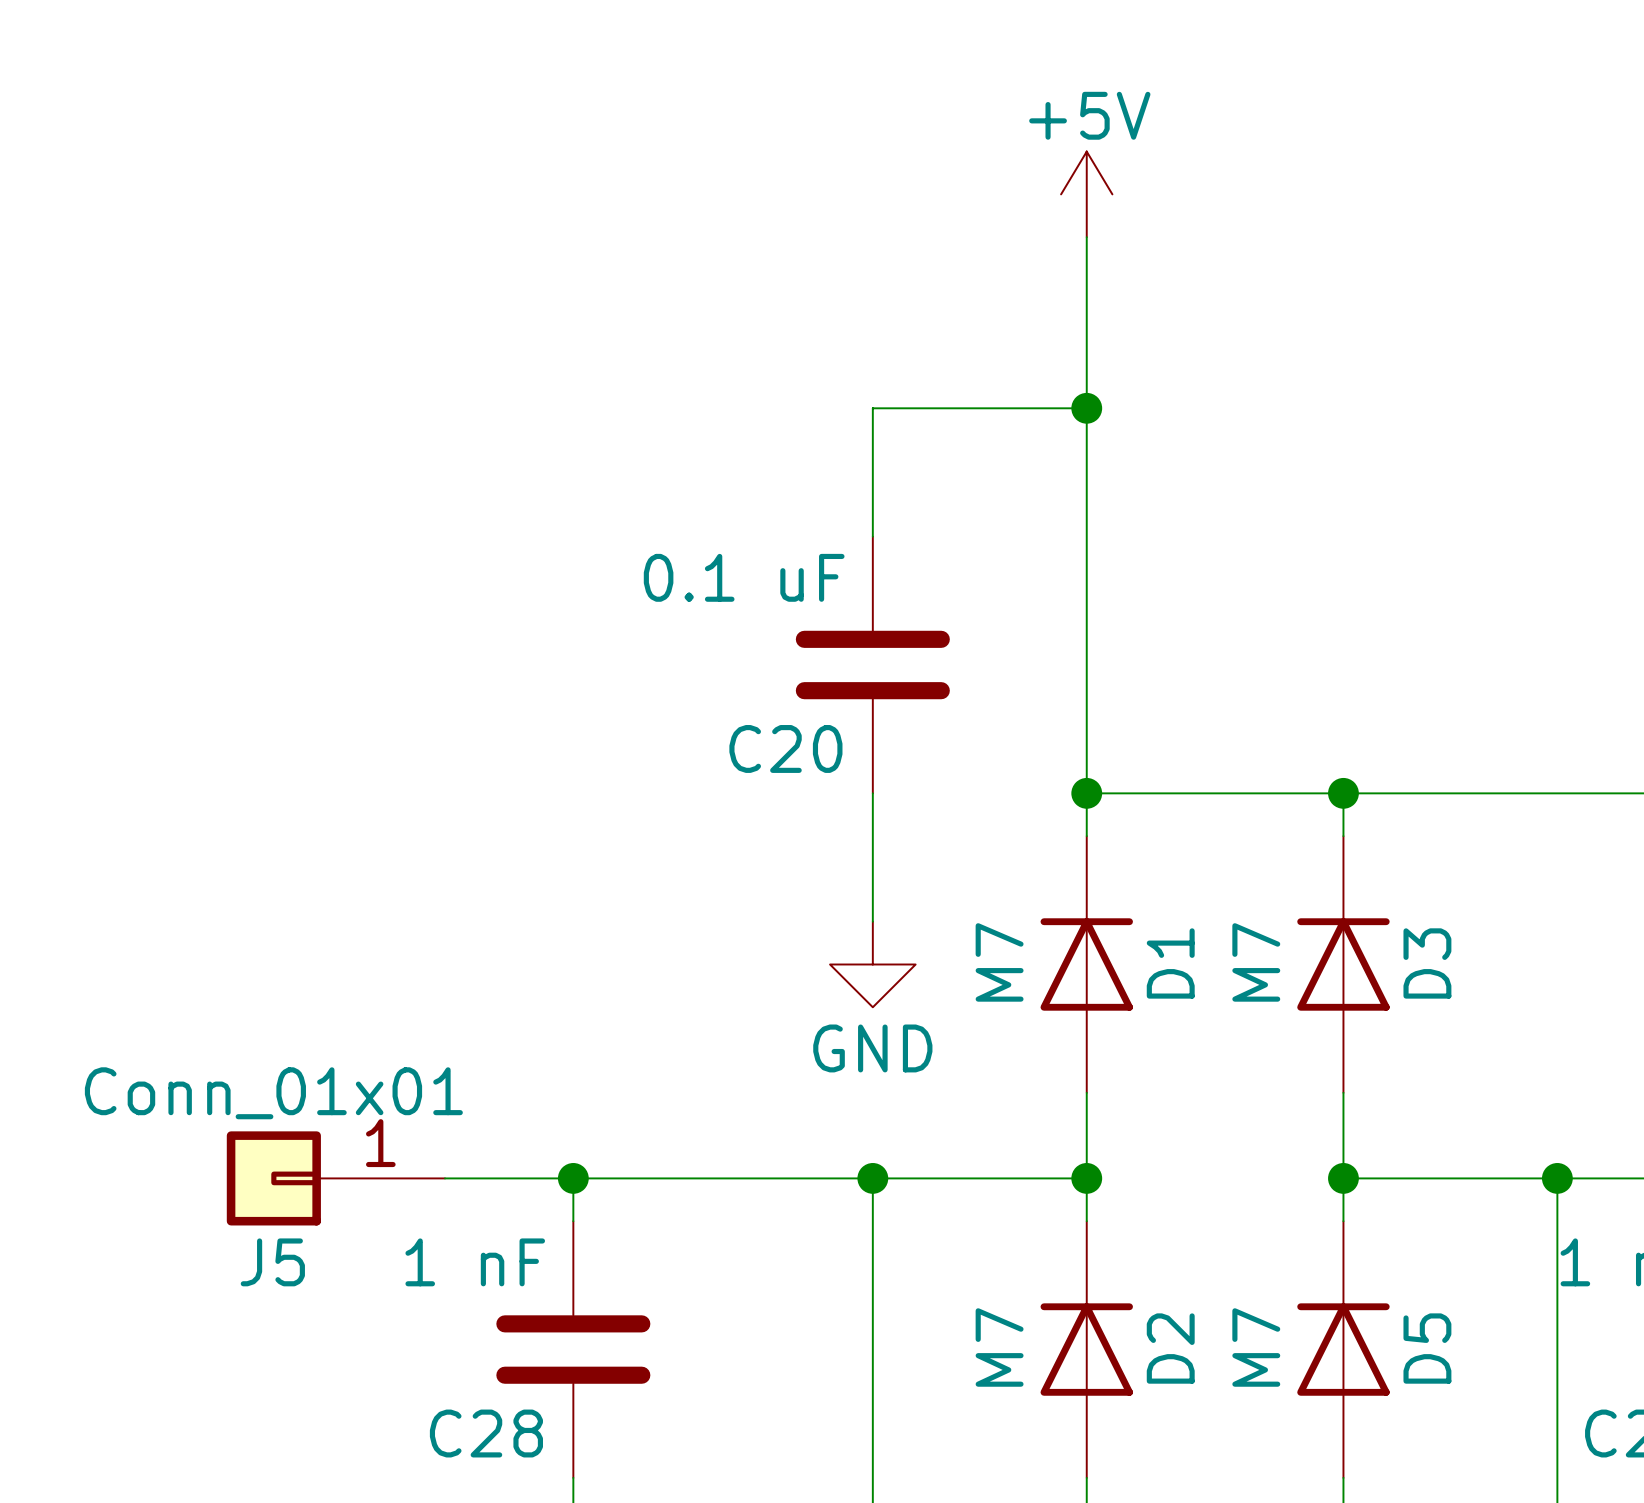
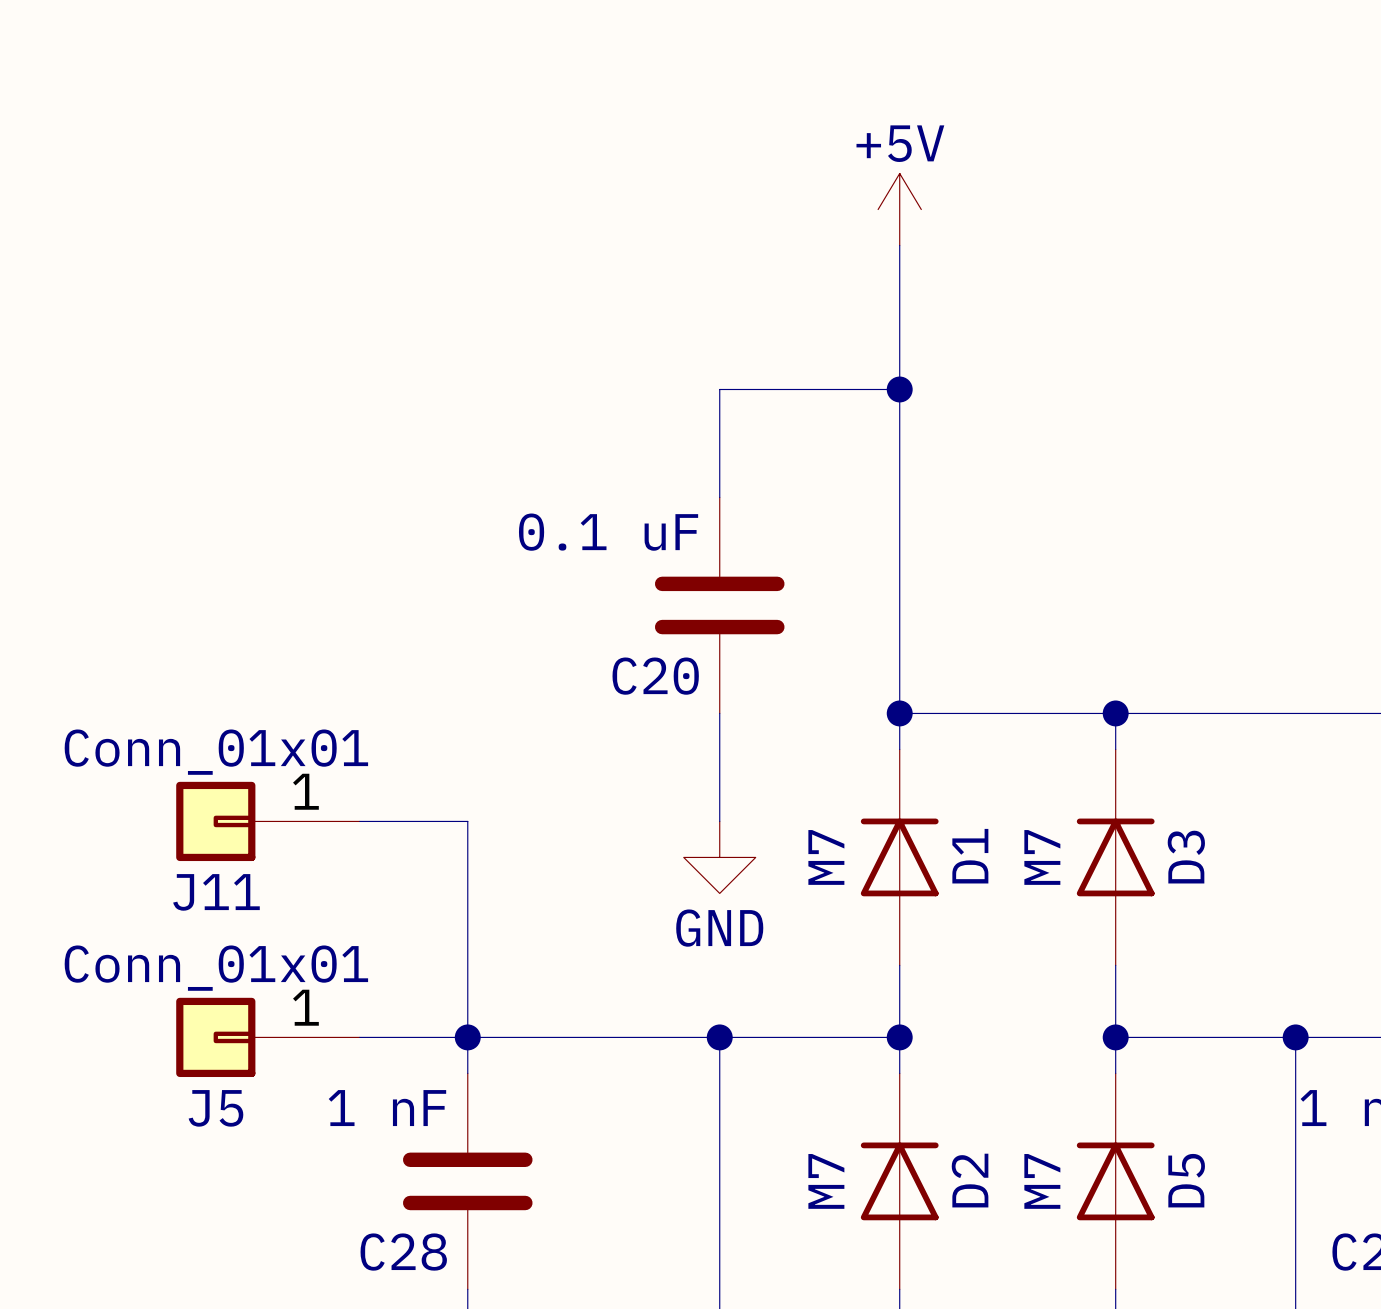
J11: none -> Conn_01x01 (267, 821)
wire: none -> (359, 821) (467, 821) (467, 1037)

